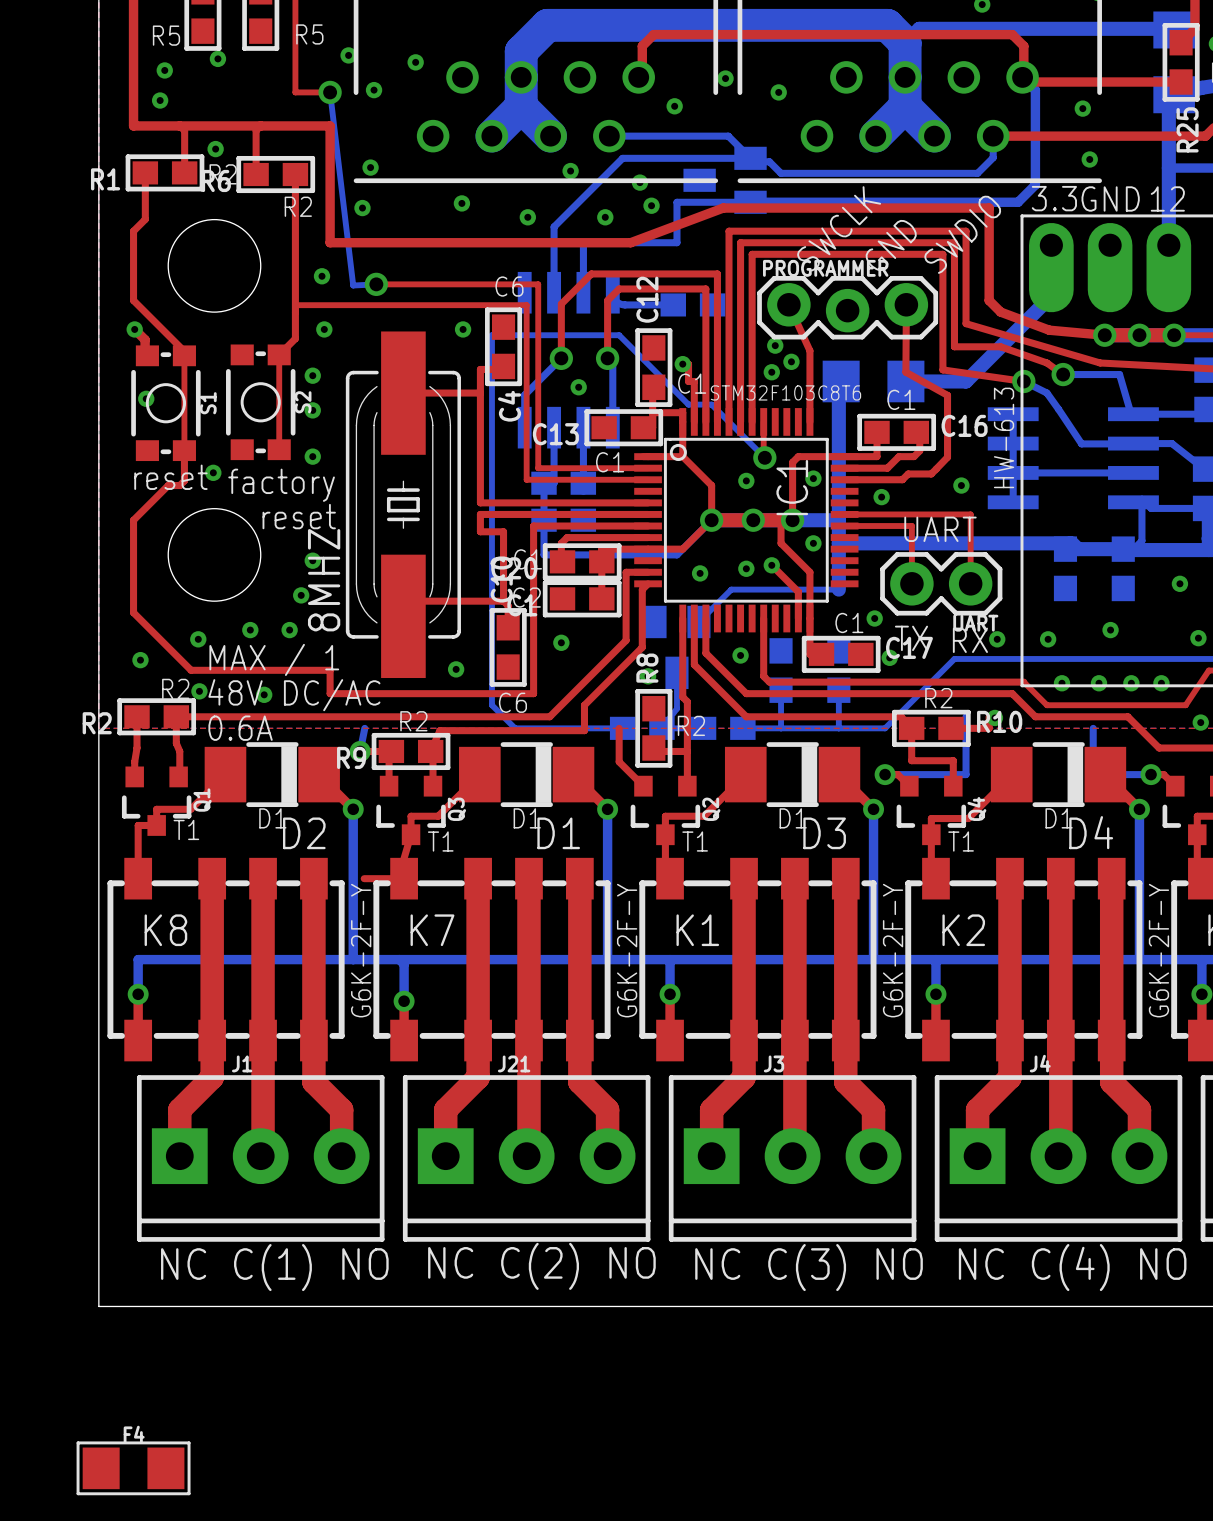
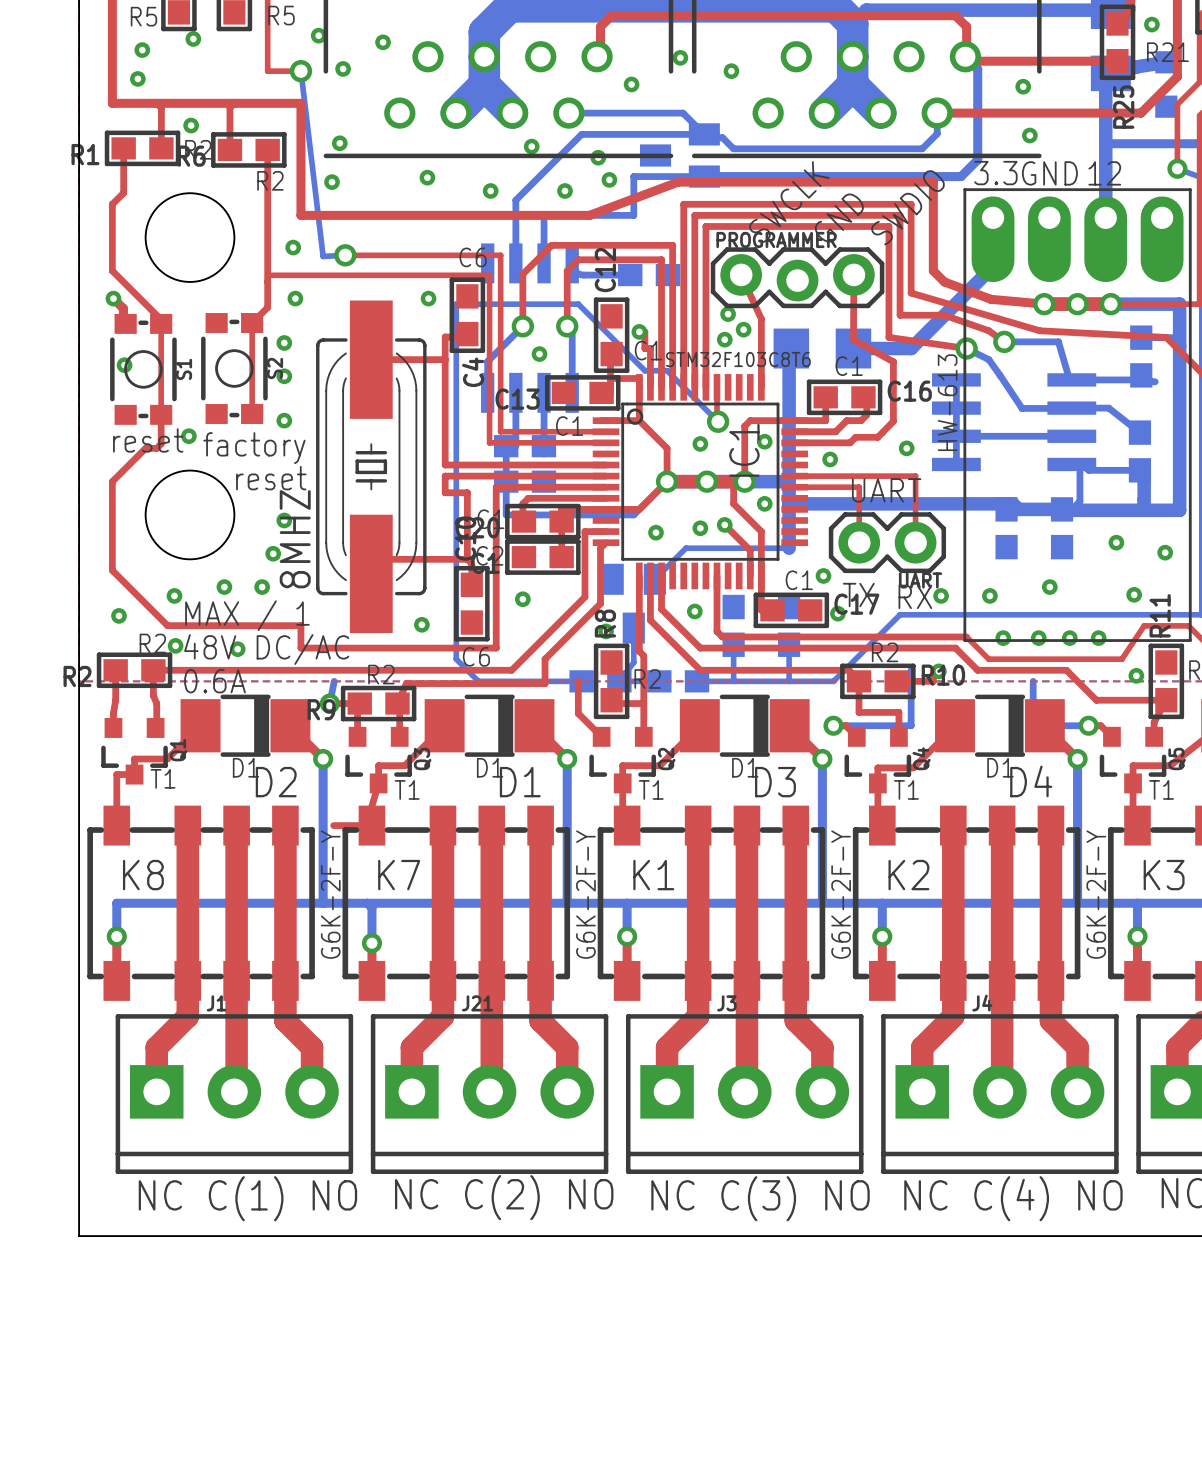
F4: (133, 1468) -> none

